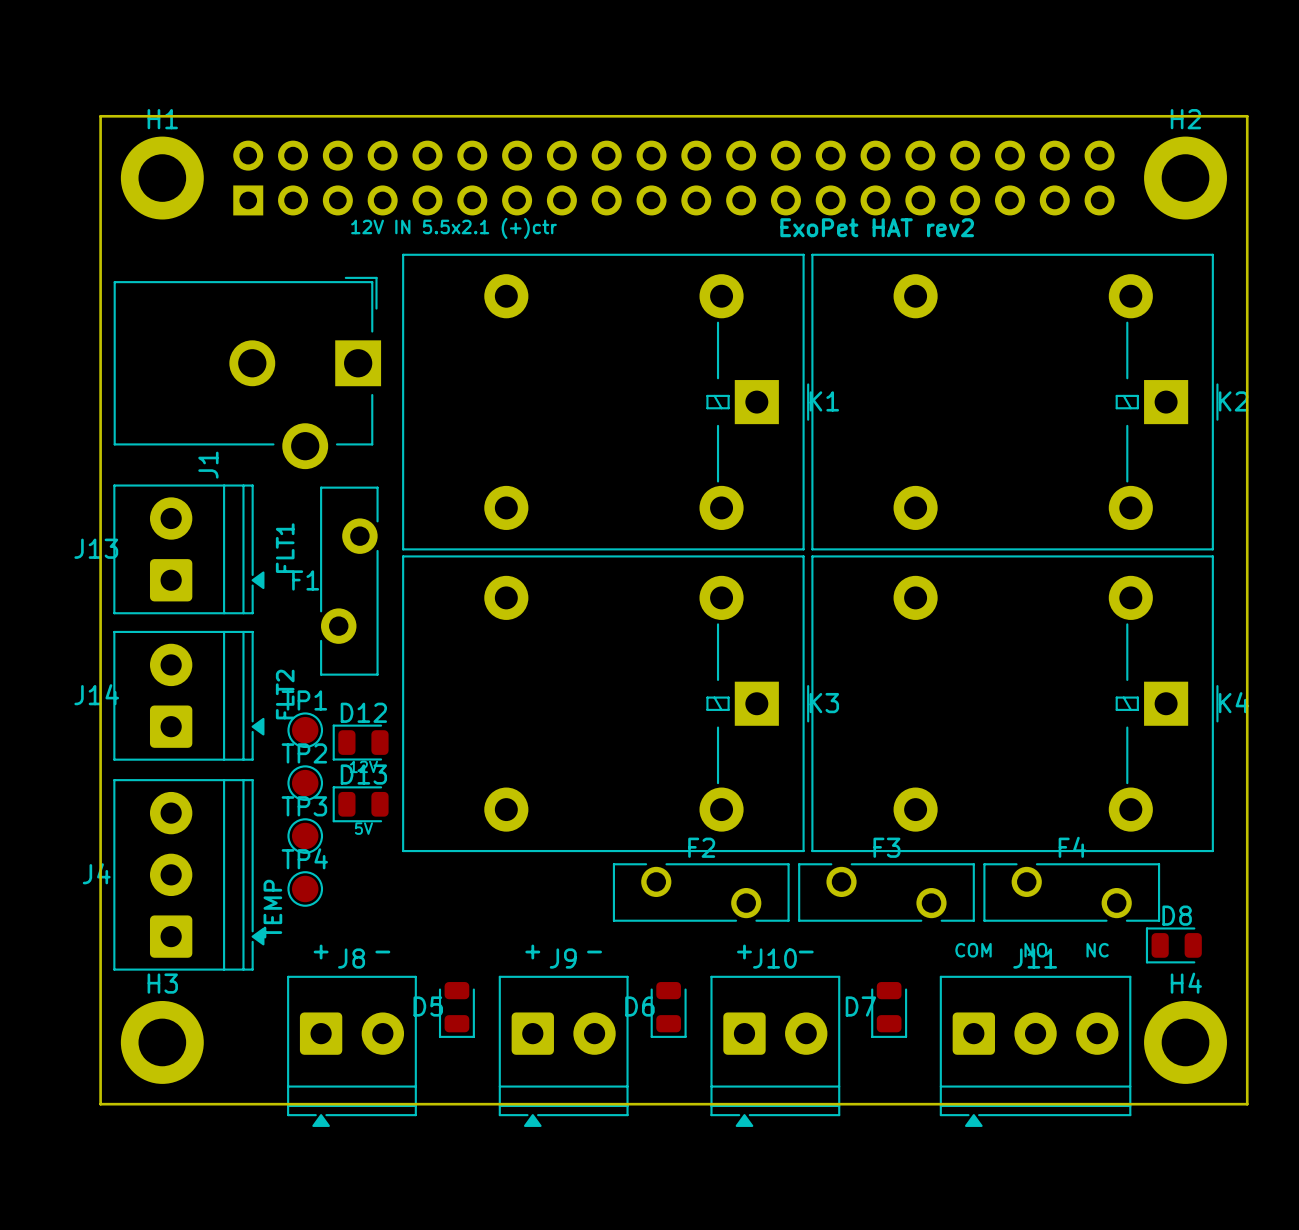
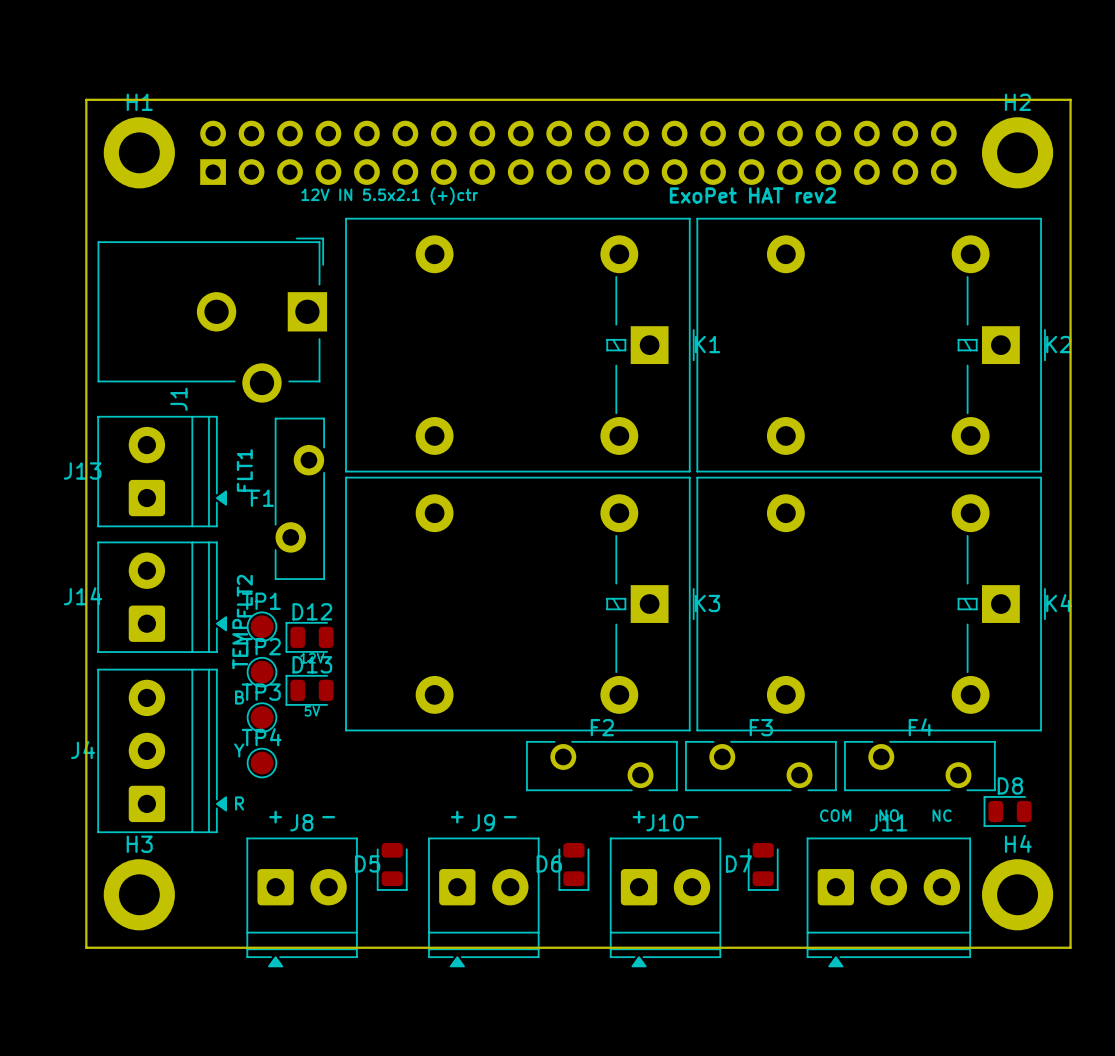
text: none -> B (239, 697)
text: none -> Y (239, 750)
text position: TEMP (272, 909) -> TEMP (240, 644)
text: none -> R (239, 803)

